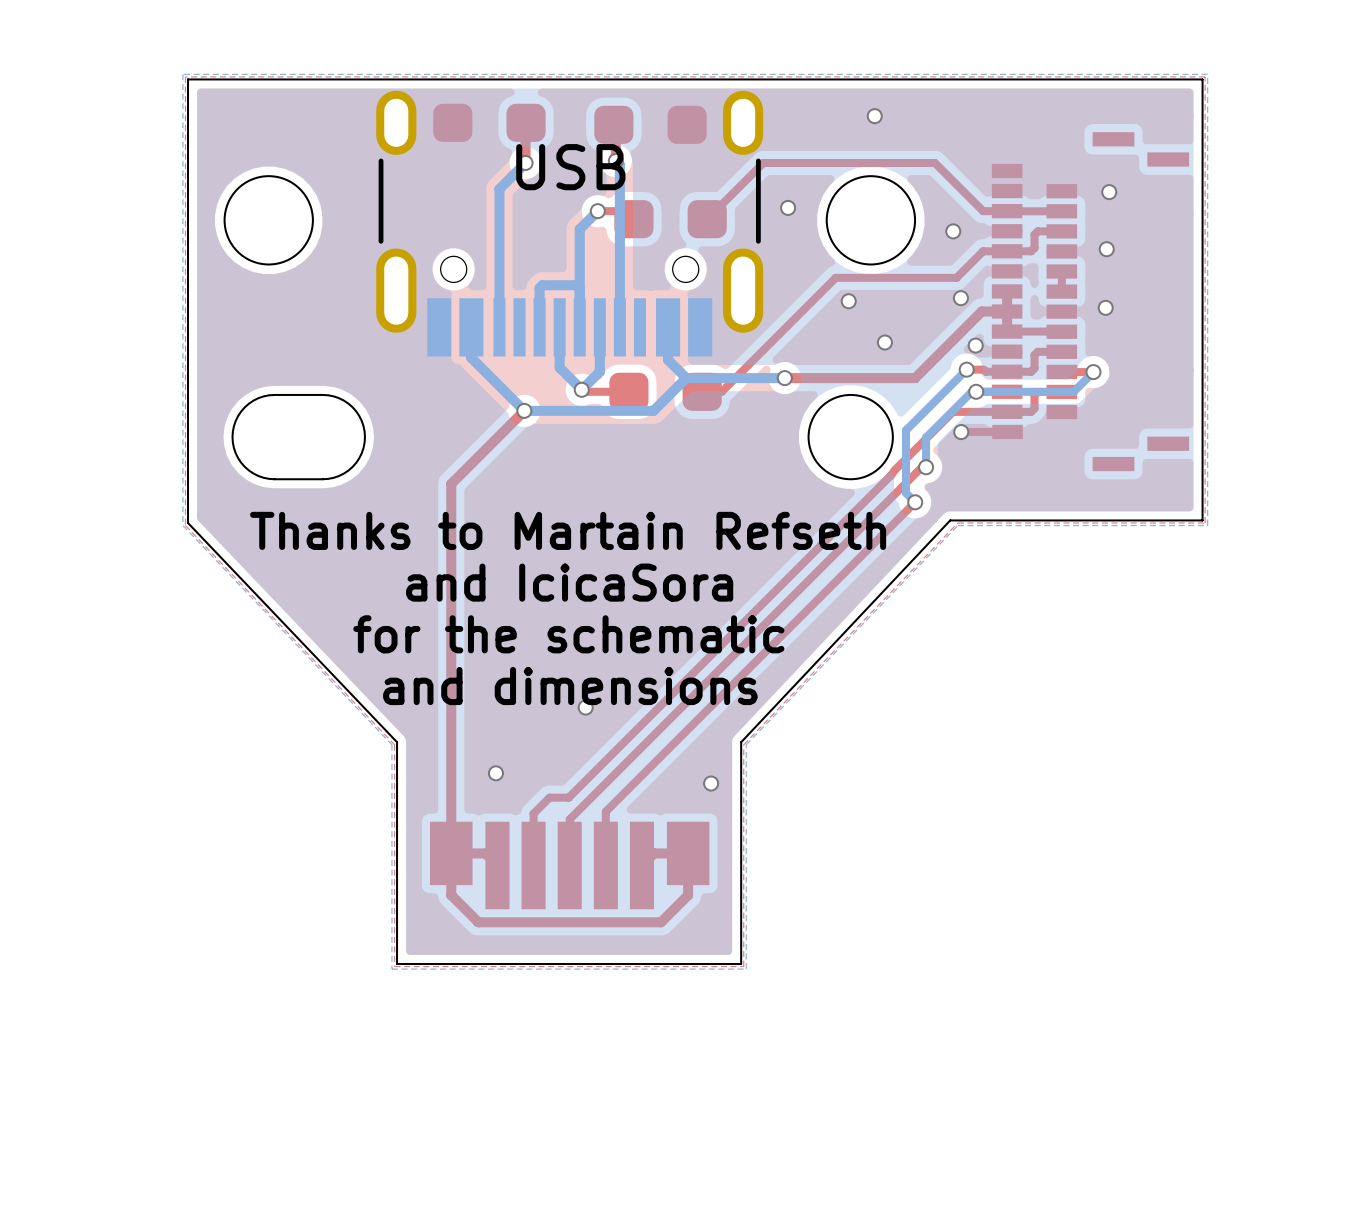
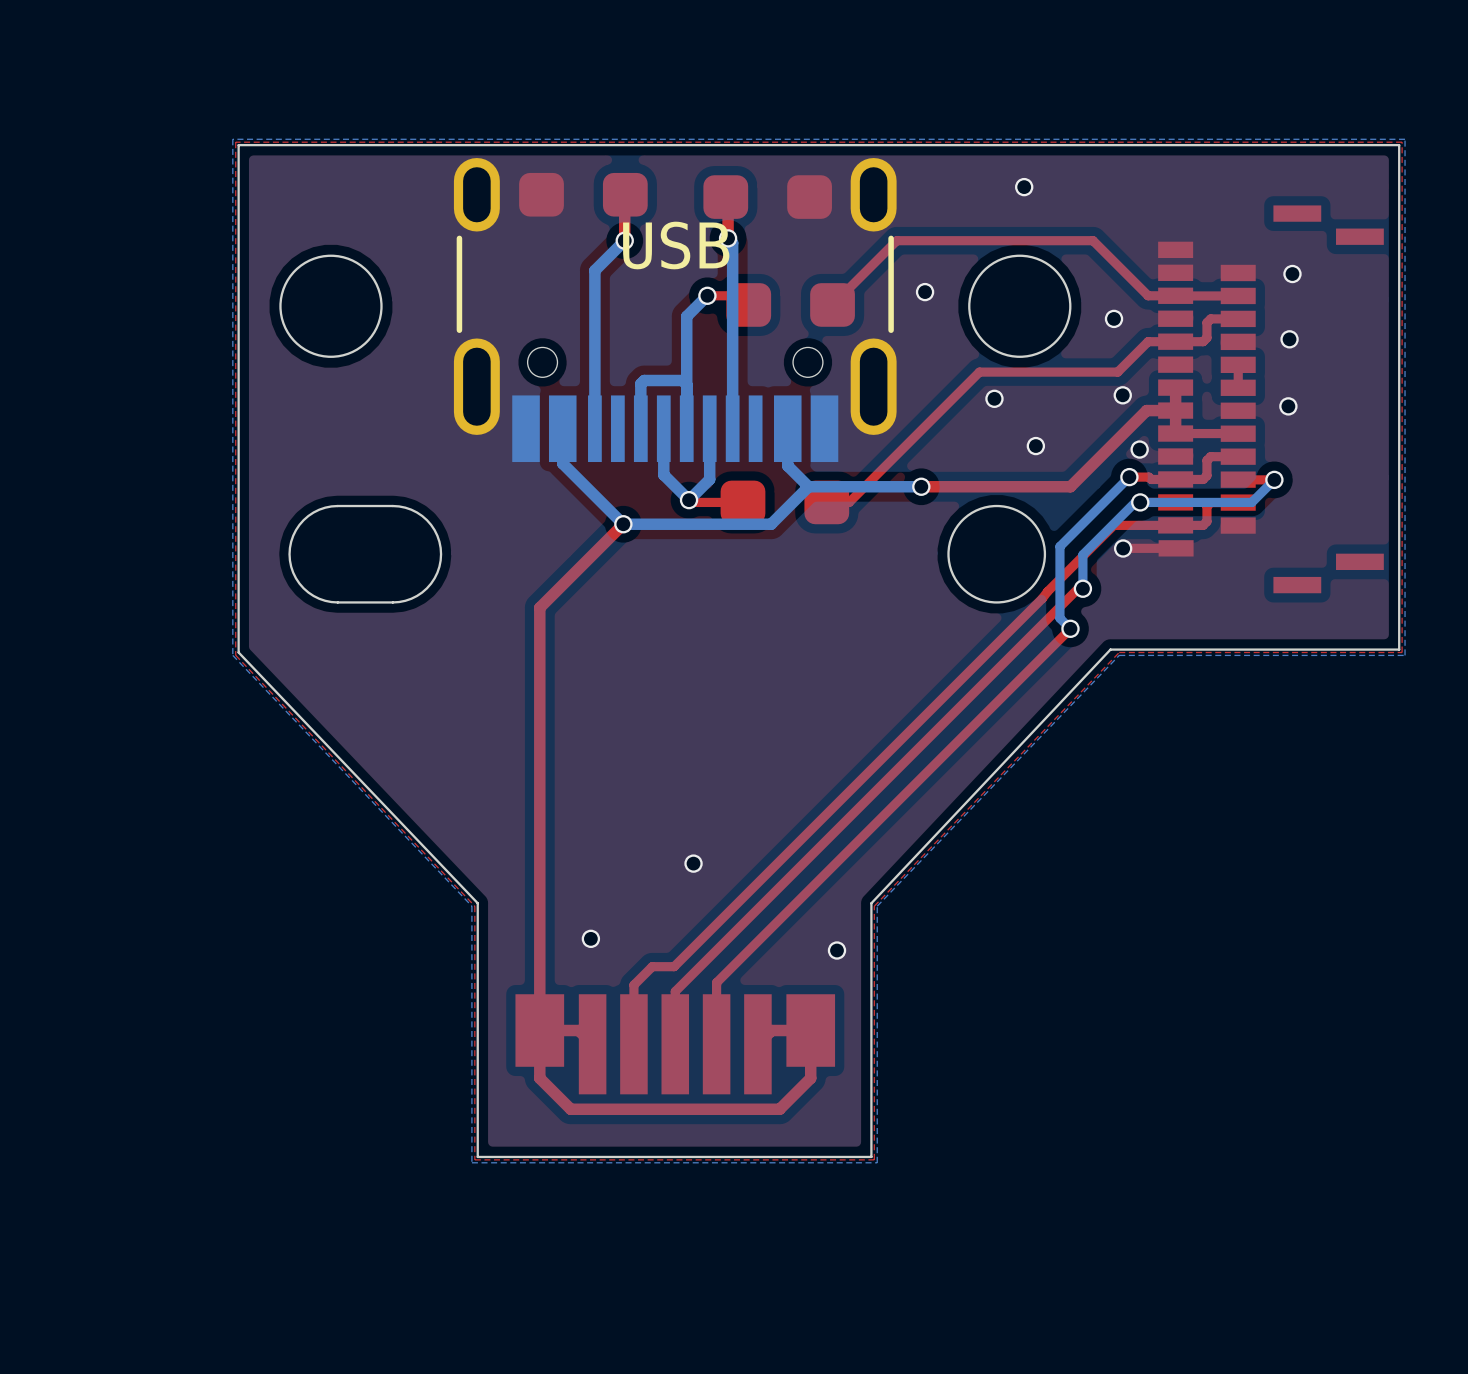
text: Thanks to Martain Refseth (568, 530) -> none
text: and IcicaSora (569, 582) -> none
text: for the schematic (568, 634) -> none
text: and dimensions (570, 686) -> none

